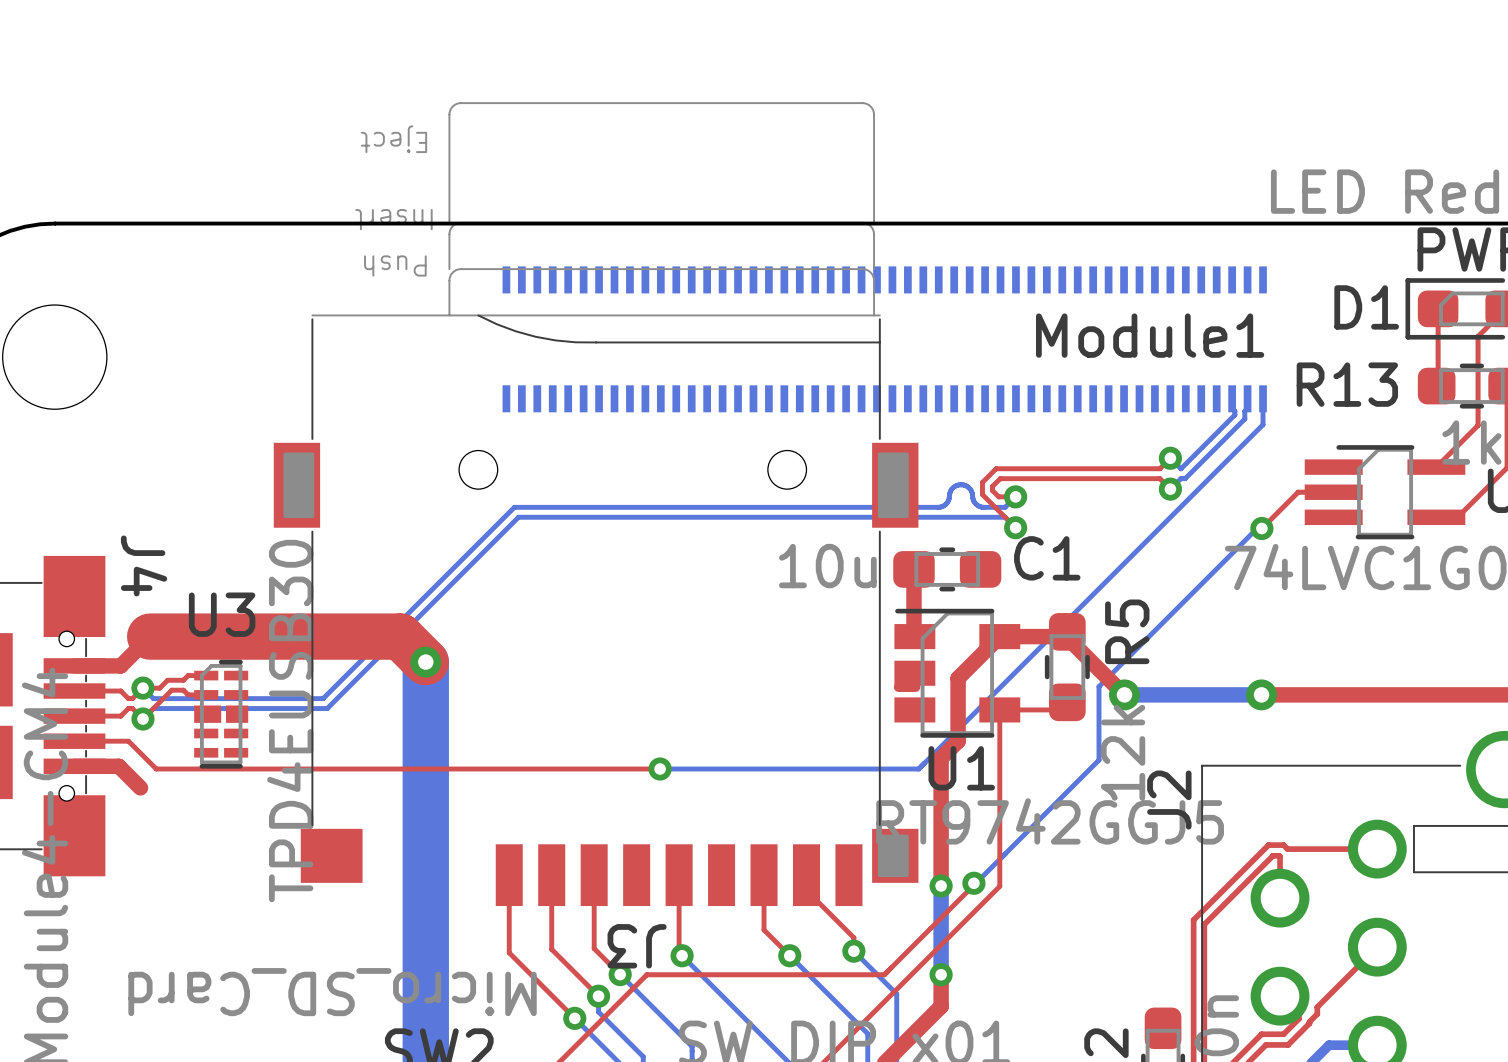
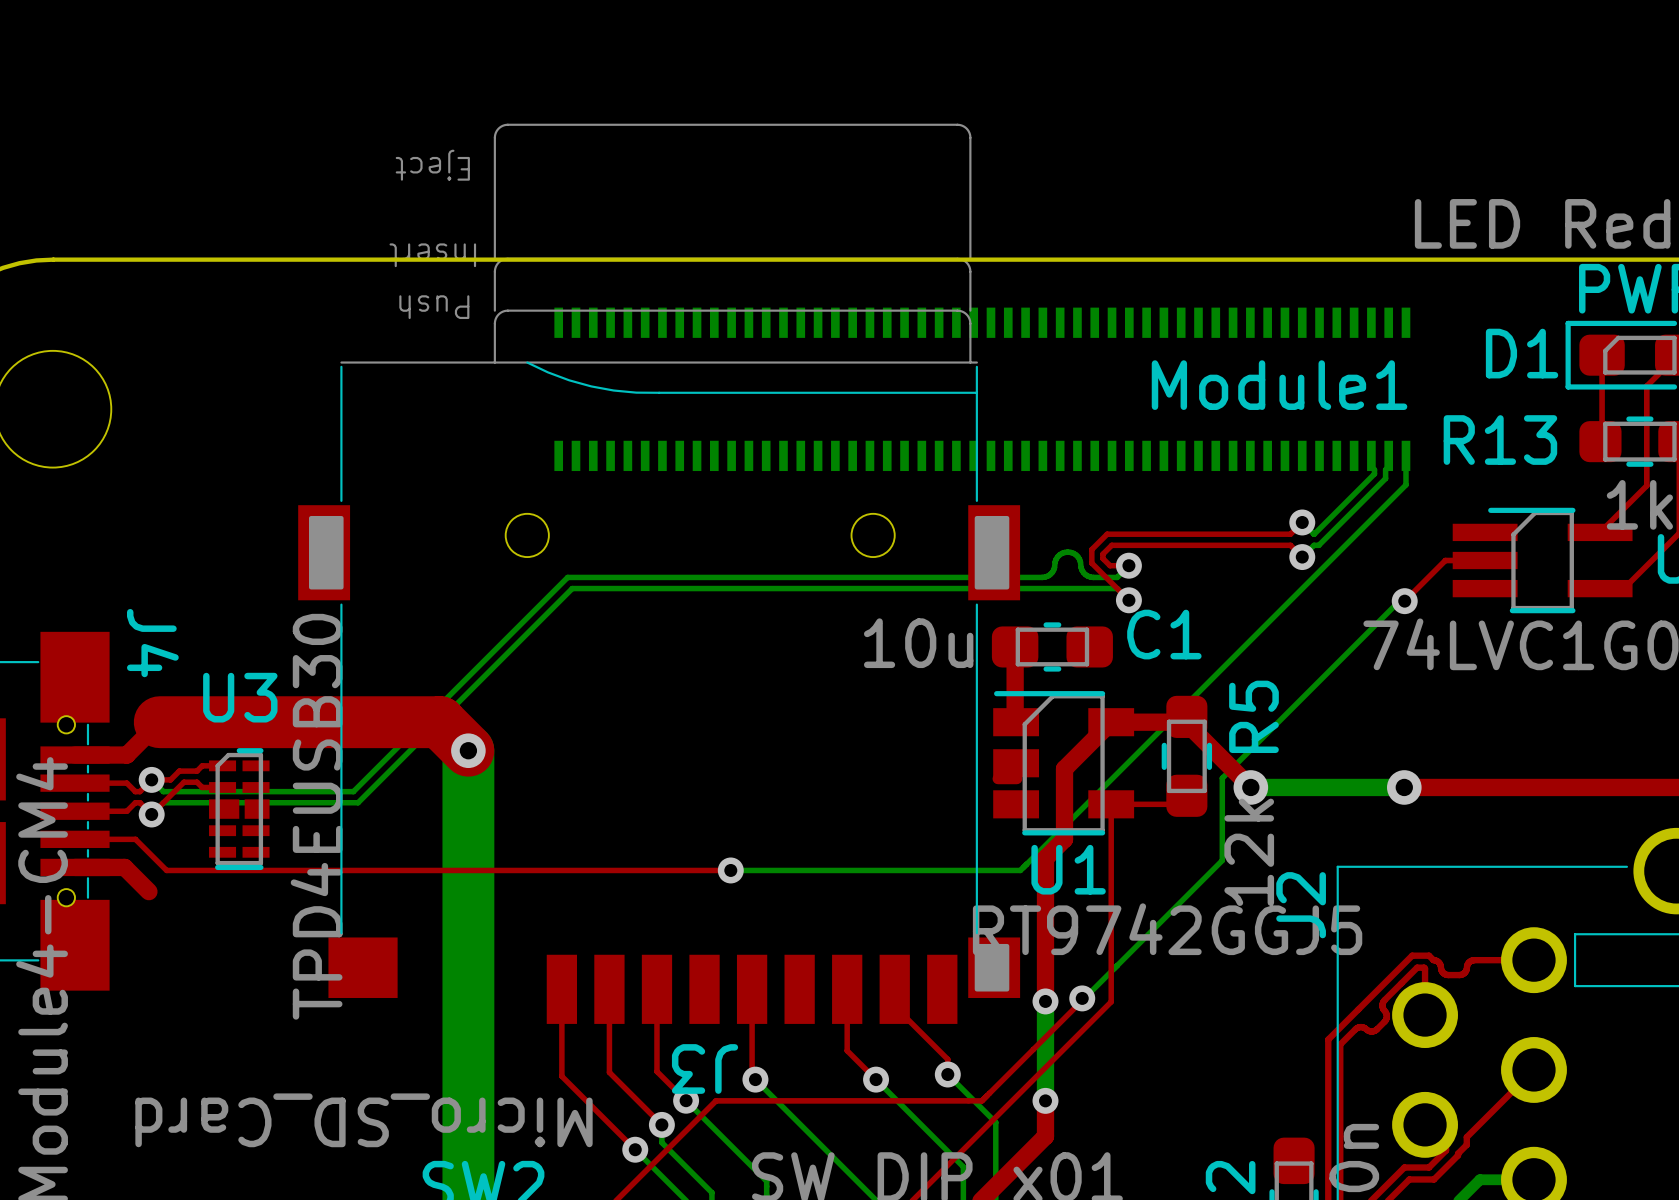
top track: (1287, 849) (1324, 849) -> (1433, 960) (1439, 962) (1442, 972) (1448, 975) (1462, 974) (1466, 970) (1468, 962) (1474, 960)
top track: (1243, 884) (1217, 910) -> (1384, 1000) (1382, 1006) (1386, 1015) (1384, 1021) (1374, 1031) (1369, 1031) (1361, 1027) (1355, 1029)

